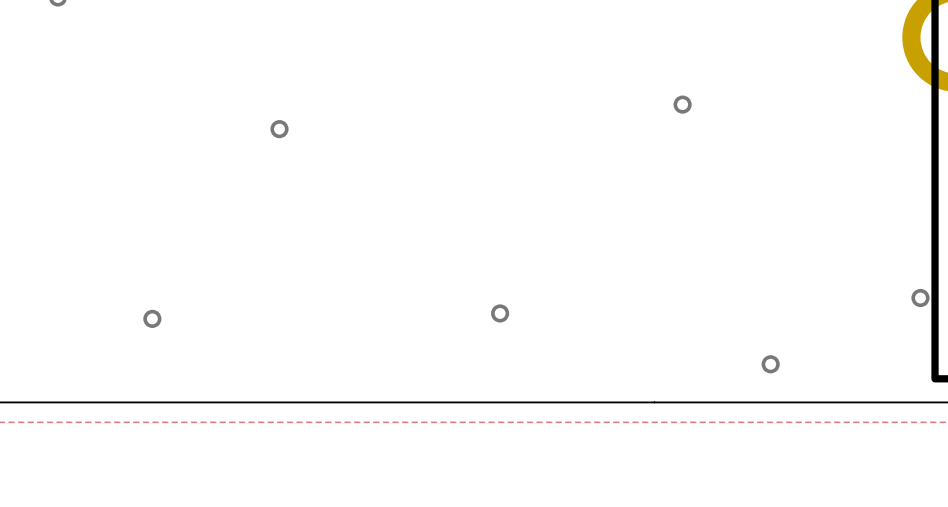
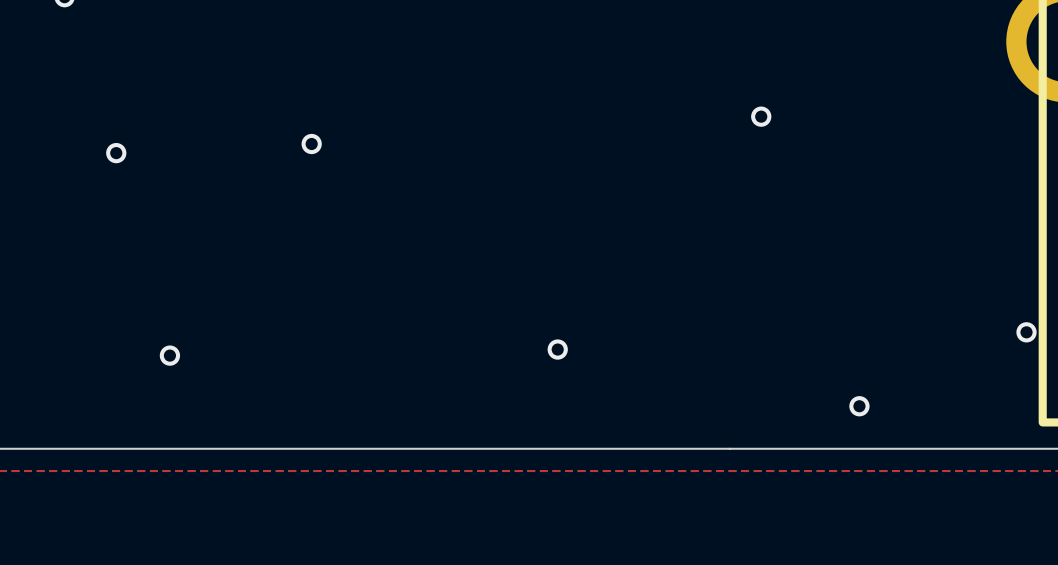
via: none -> (116, 153)

